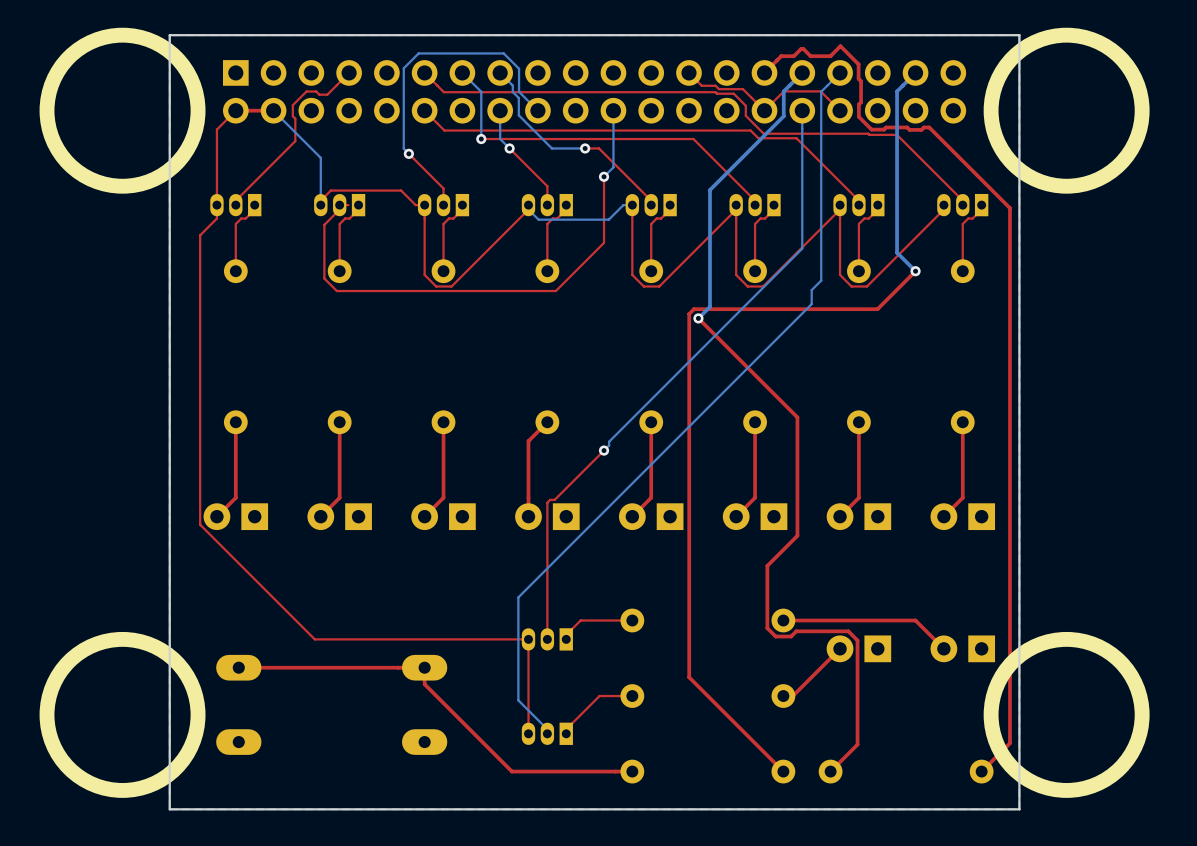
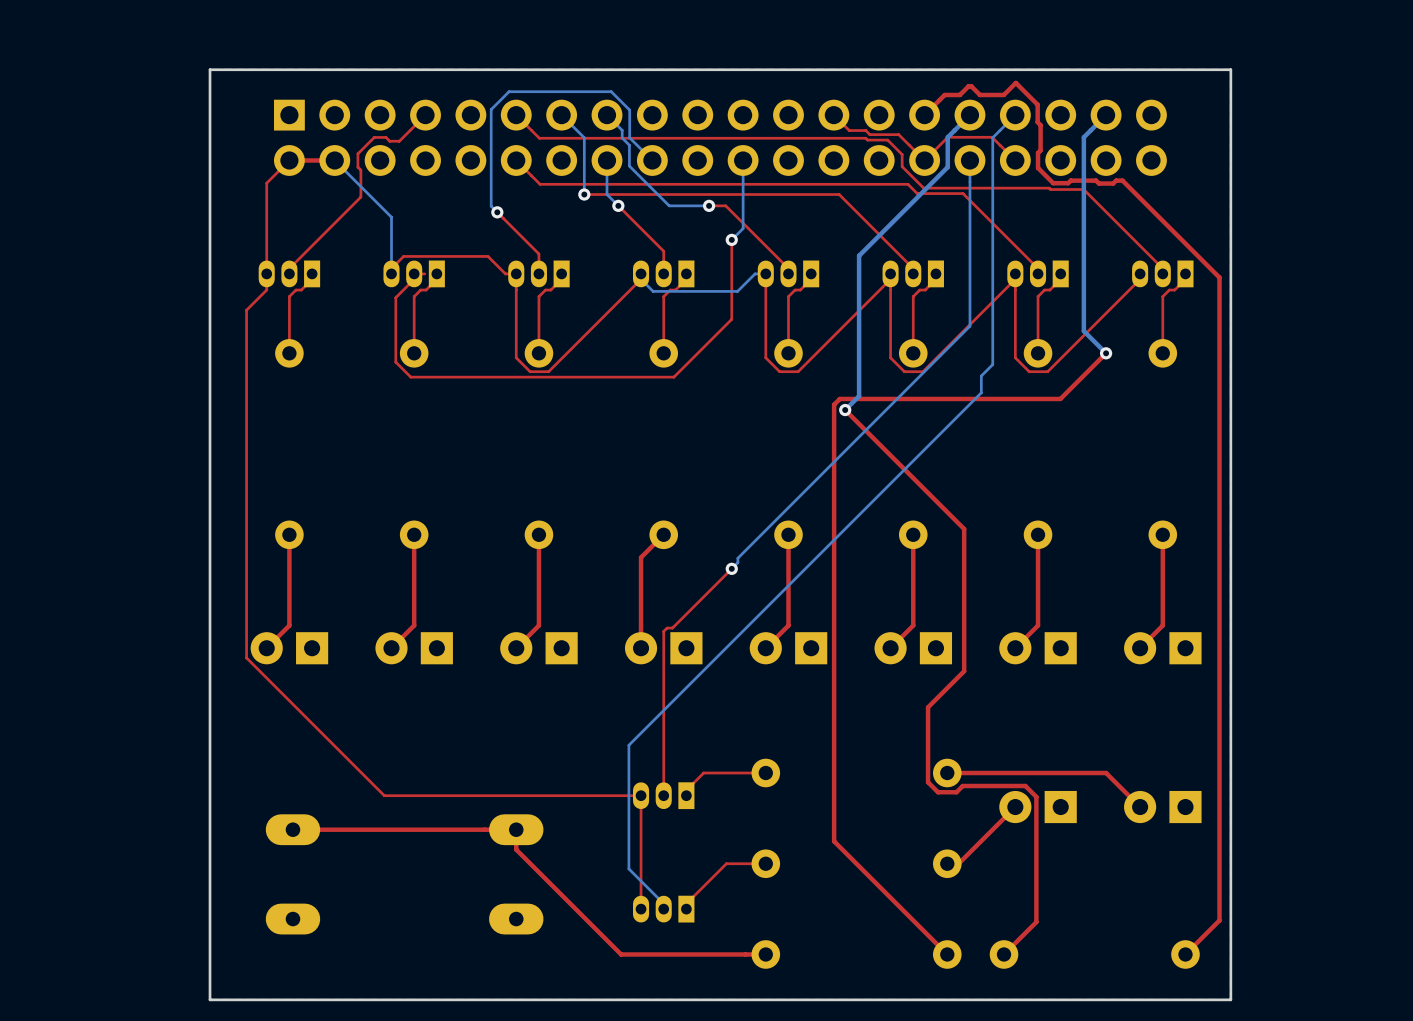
drawing: [39, 27, 206, 194] -> none
drawing: [983, 27, 1150, 194] -> none
drawing: [39, 631, 206, 798] -> none
drawing: [983, 631, 1150, 798] -> none

